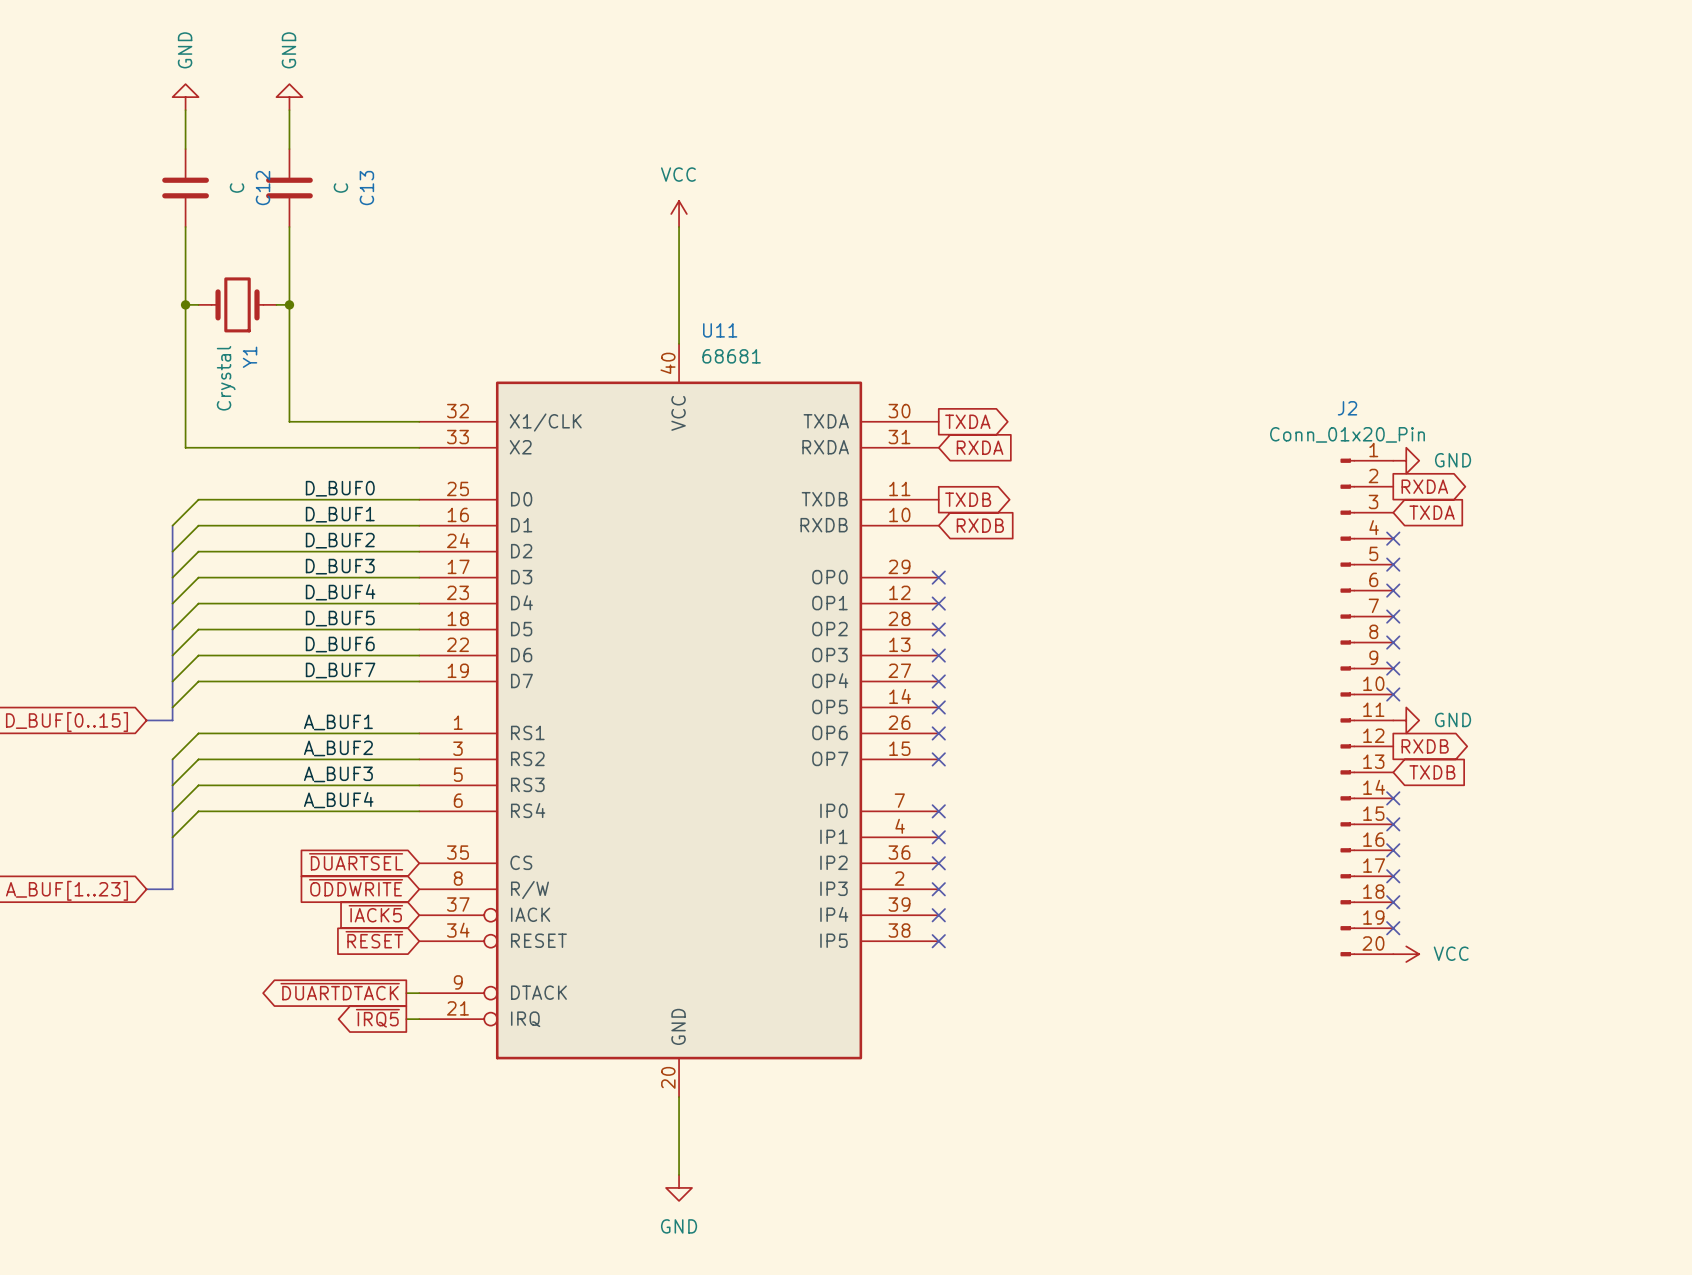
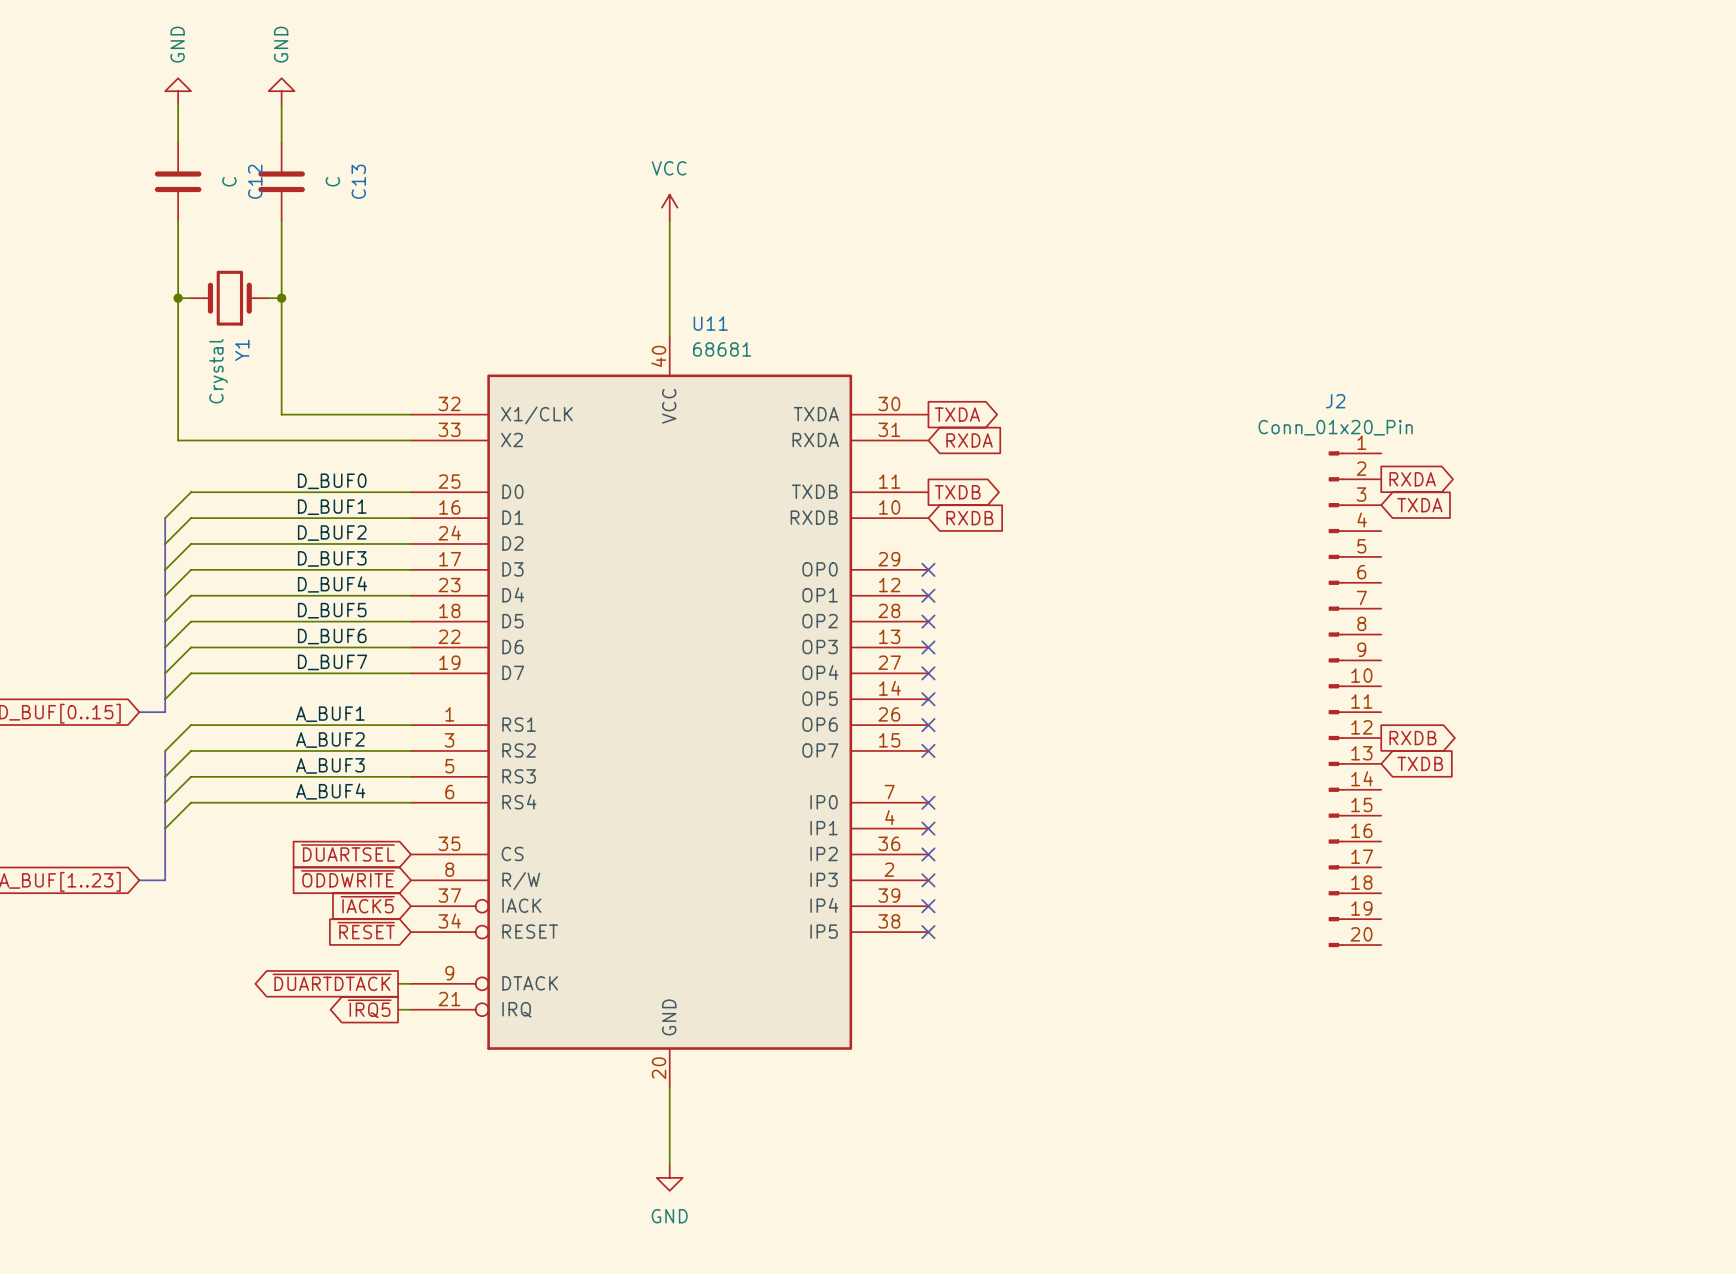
power symbol: GND (1406, 460) -> none
no-connect mark: (1393, 538) -> none
no-connect mark: (1393, 564) -> none
no-connect mark: (1393, 590) -> none
no-connect mark: (1393, 616) -> none
no-connect mark: (1393, 642) -> none
no-connect mark: (1393, 668) -> none
no-connect mark: (1393, 694) -> none
power symbol: GND (1406, 720) -> none
no-connect mark: (1393, 798) -> none
no-connect mark: (1393, 824) -> none
no-connect mark: (1393, 850) -> none
no-connect mark: (1393, 876) -> none
no-connect mark: (1393, 902) -> none
no-connect mark: (1393, 928) -> none
power symbol: VCC (1406, 954) -> none

